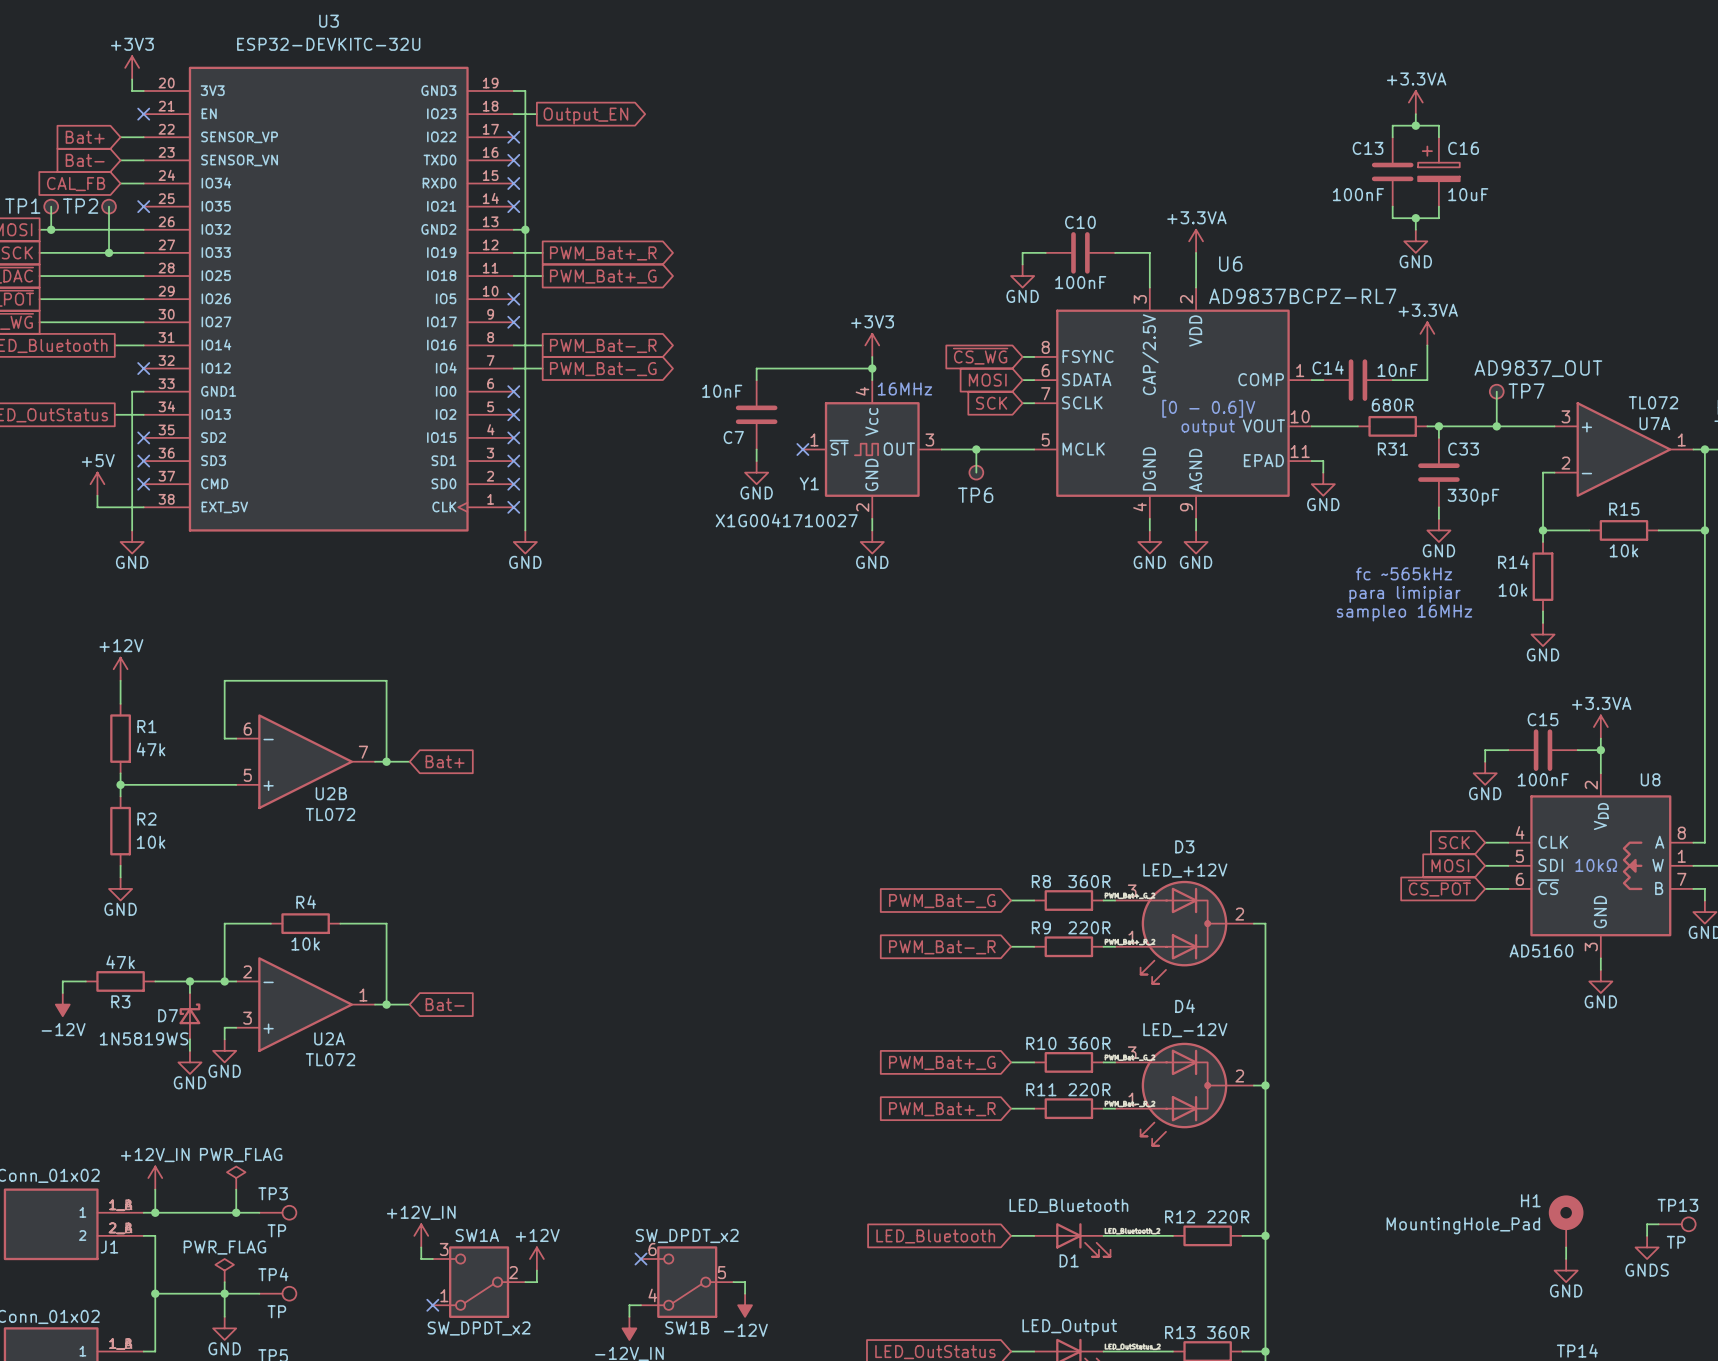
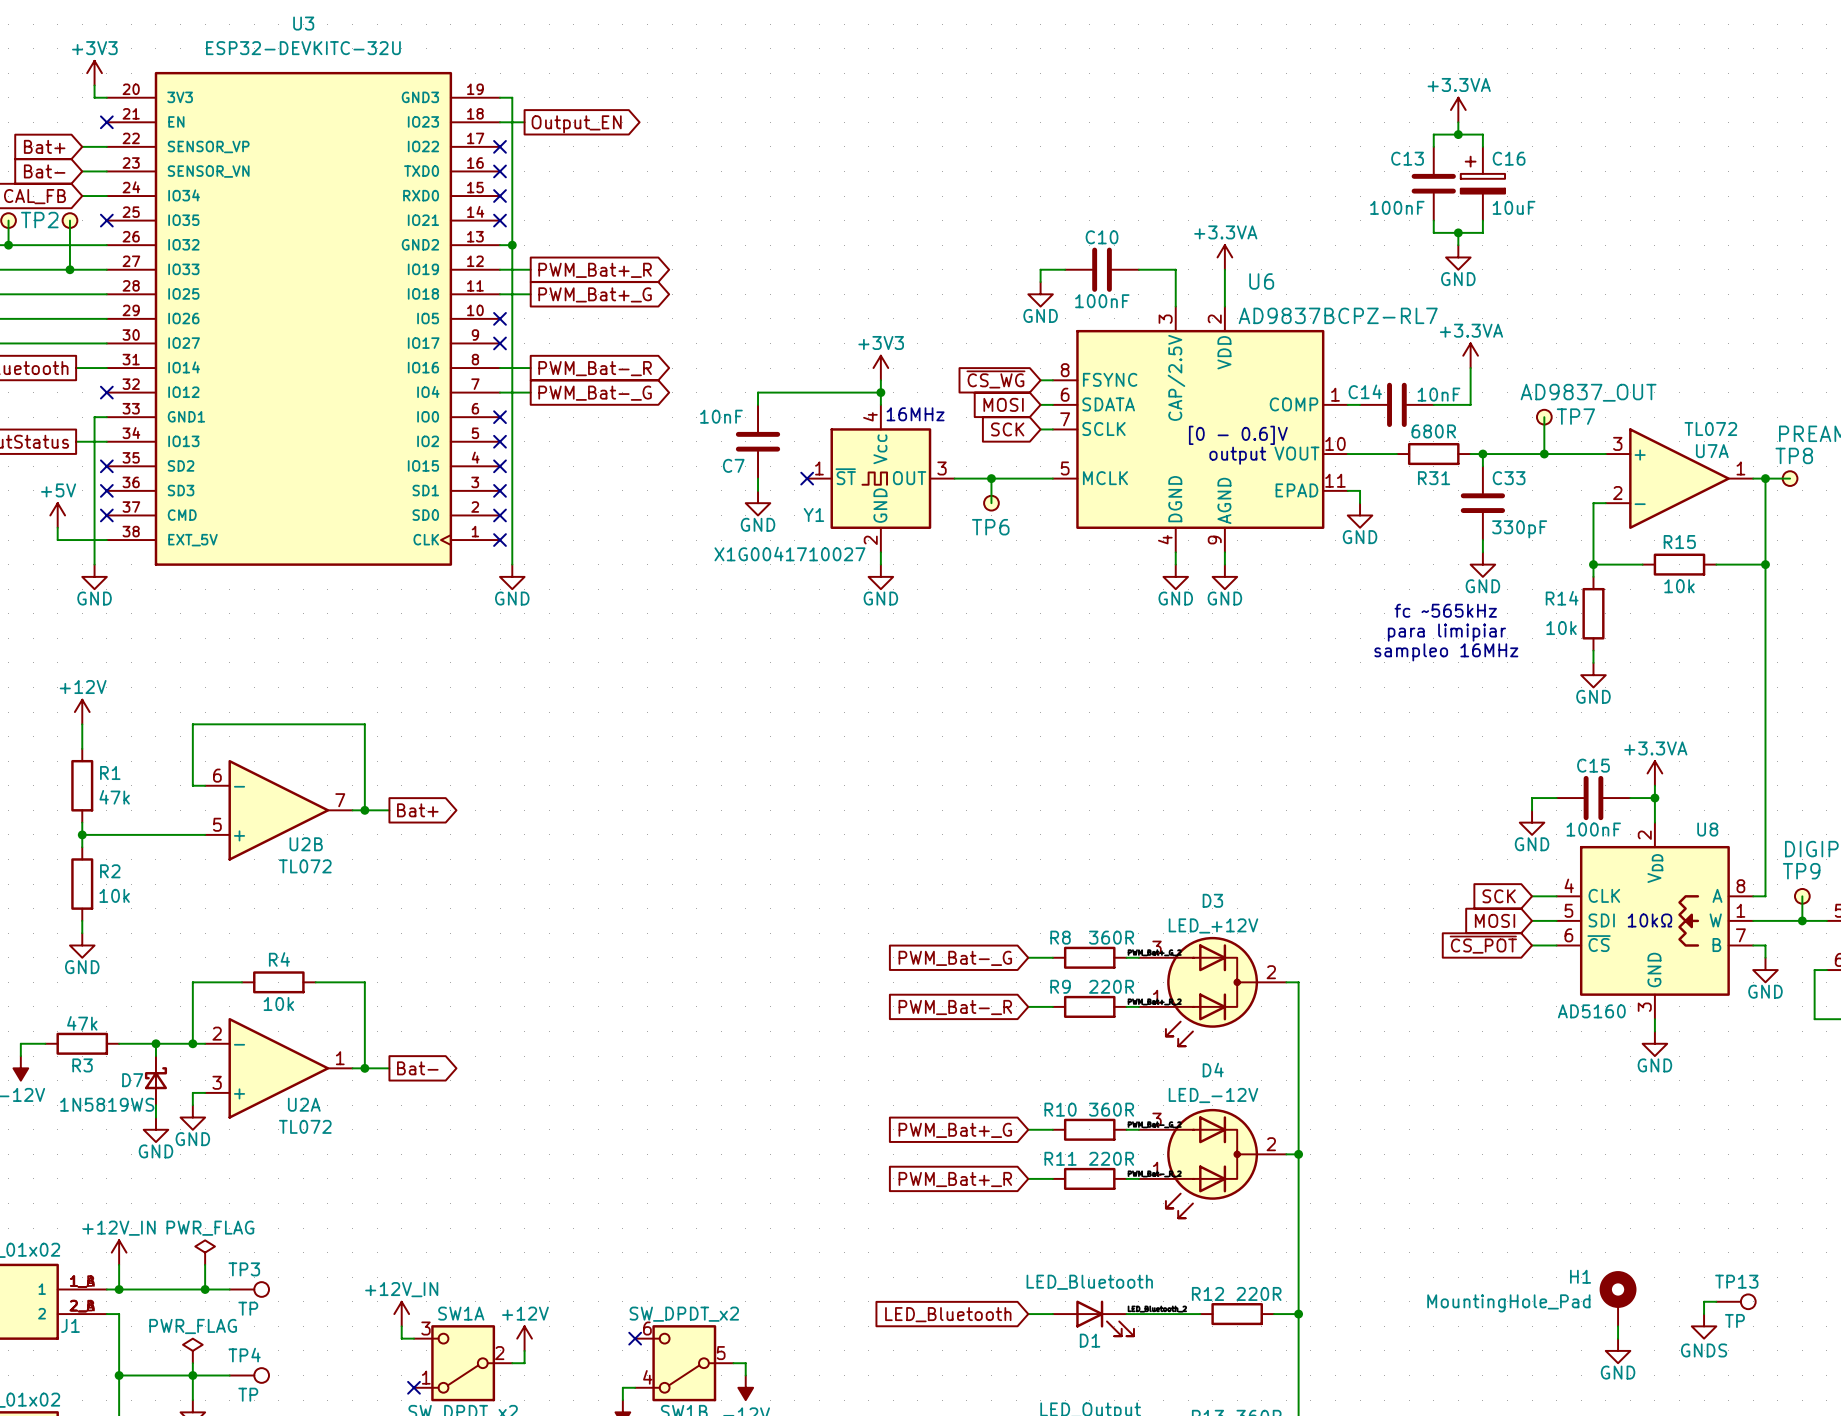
global label shape: input (445, 761) -> output (417, 810)
global label shape: input (445, 1004) -> output (417, 1068)

